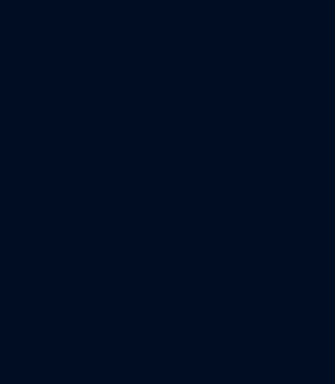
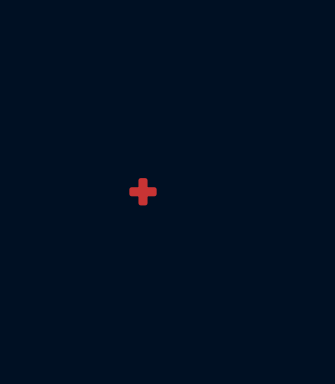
drawing: none -> [129, 178, 157, 206]

